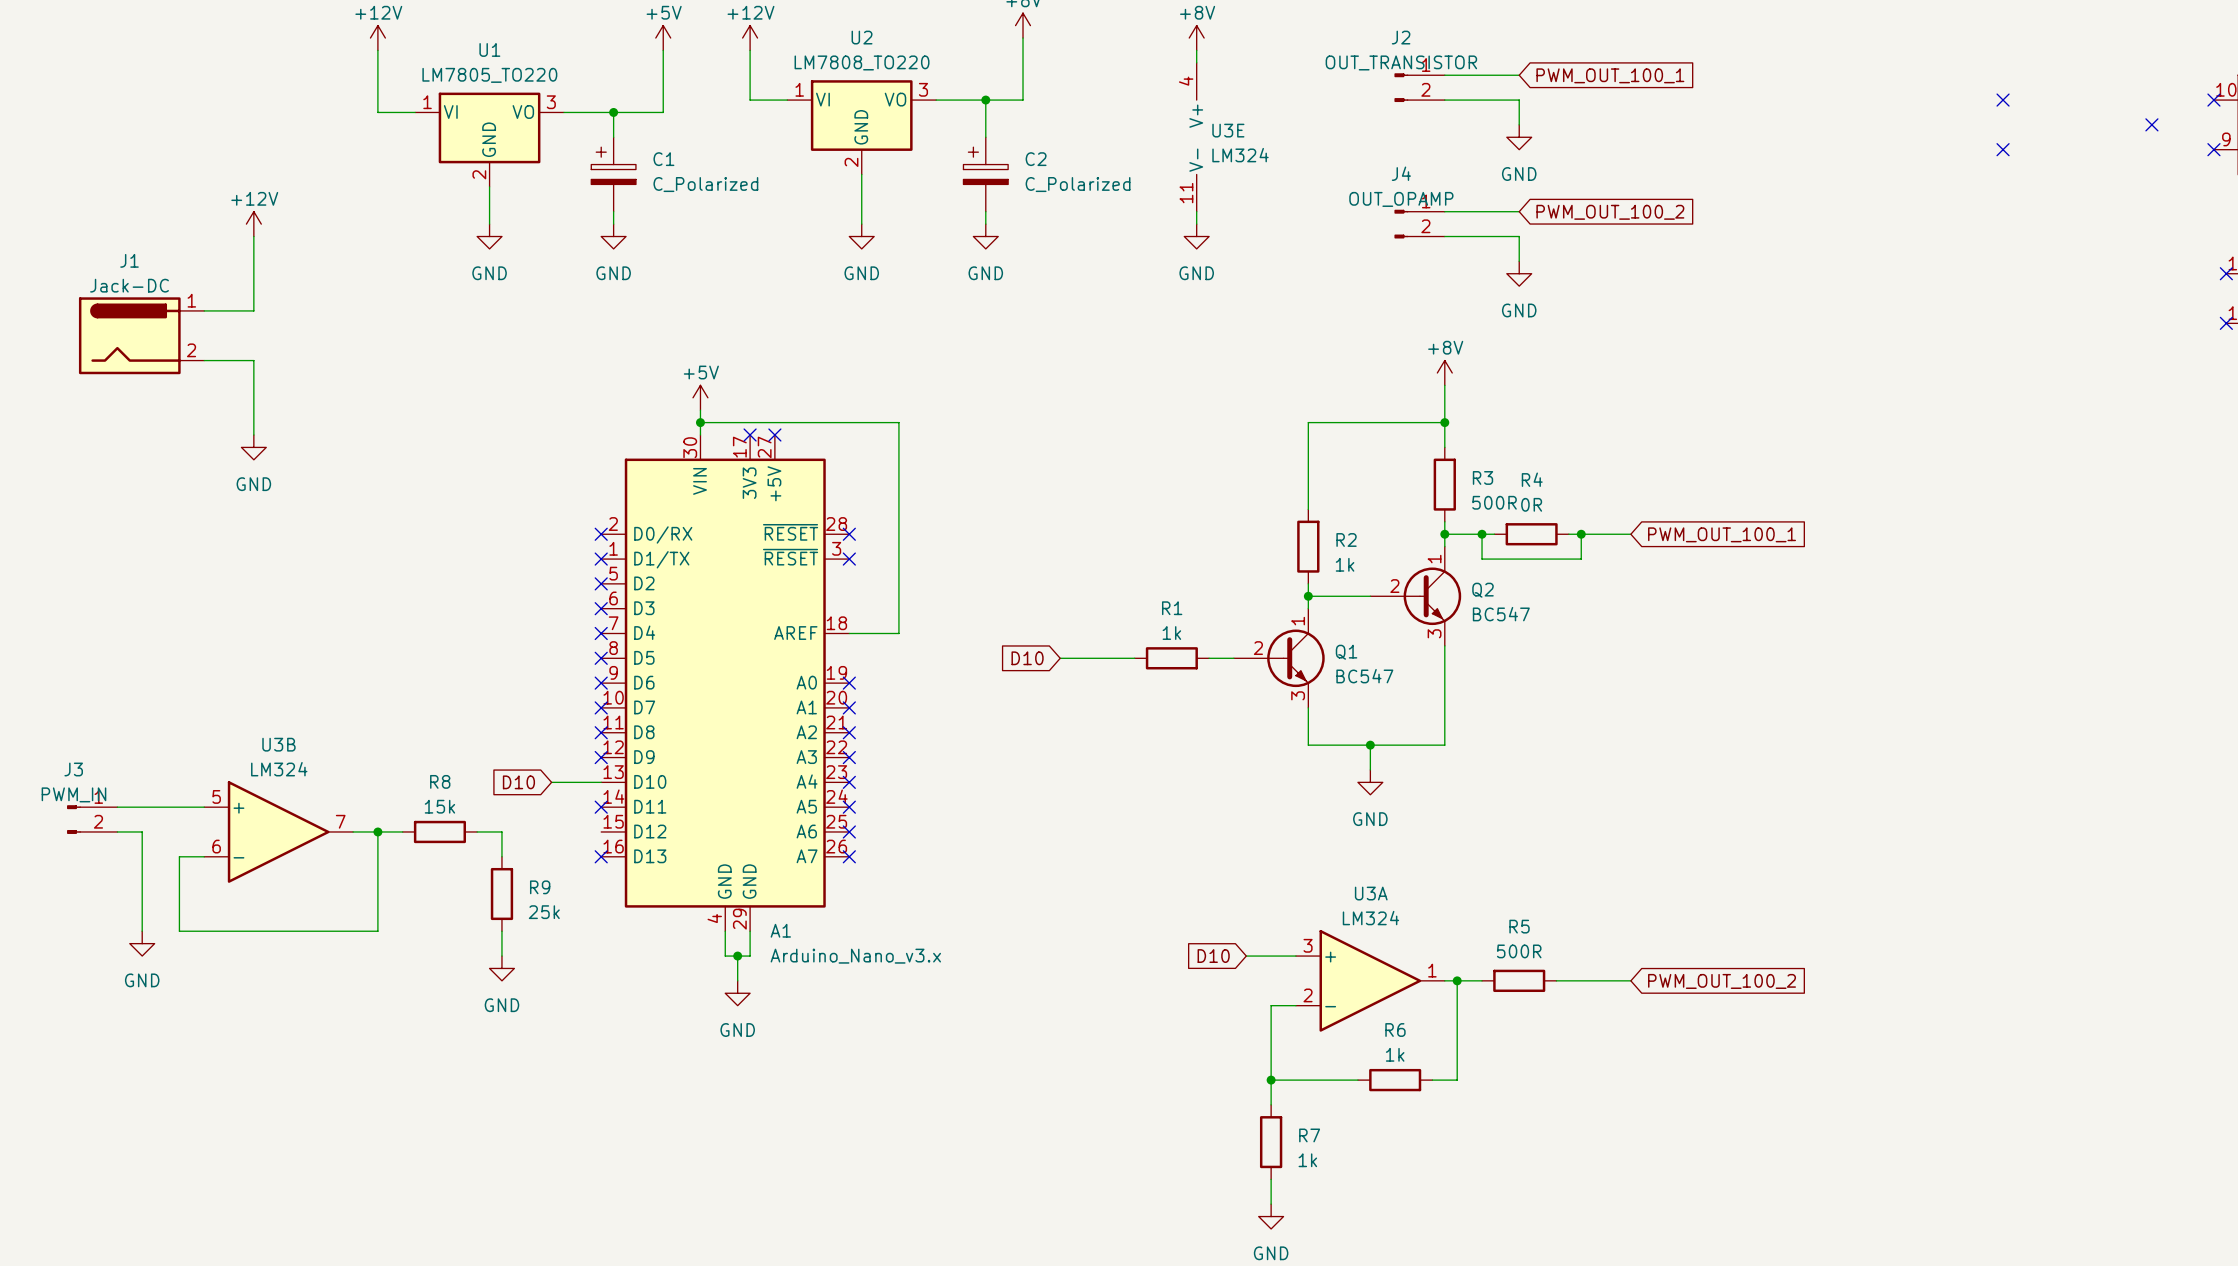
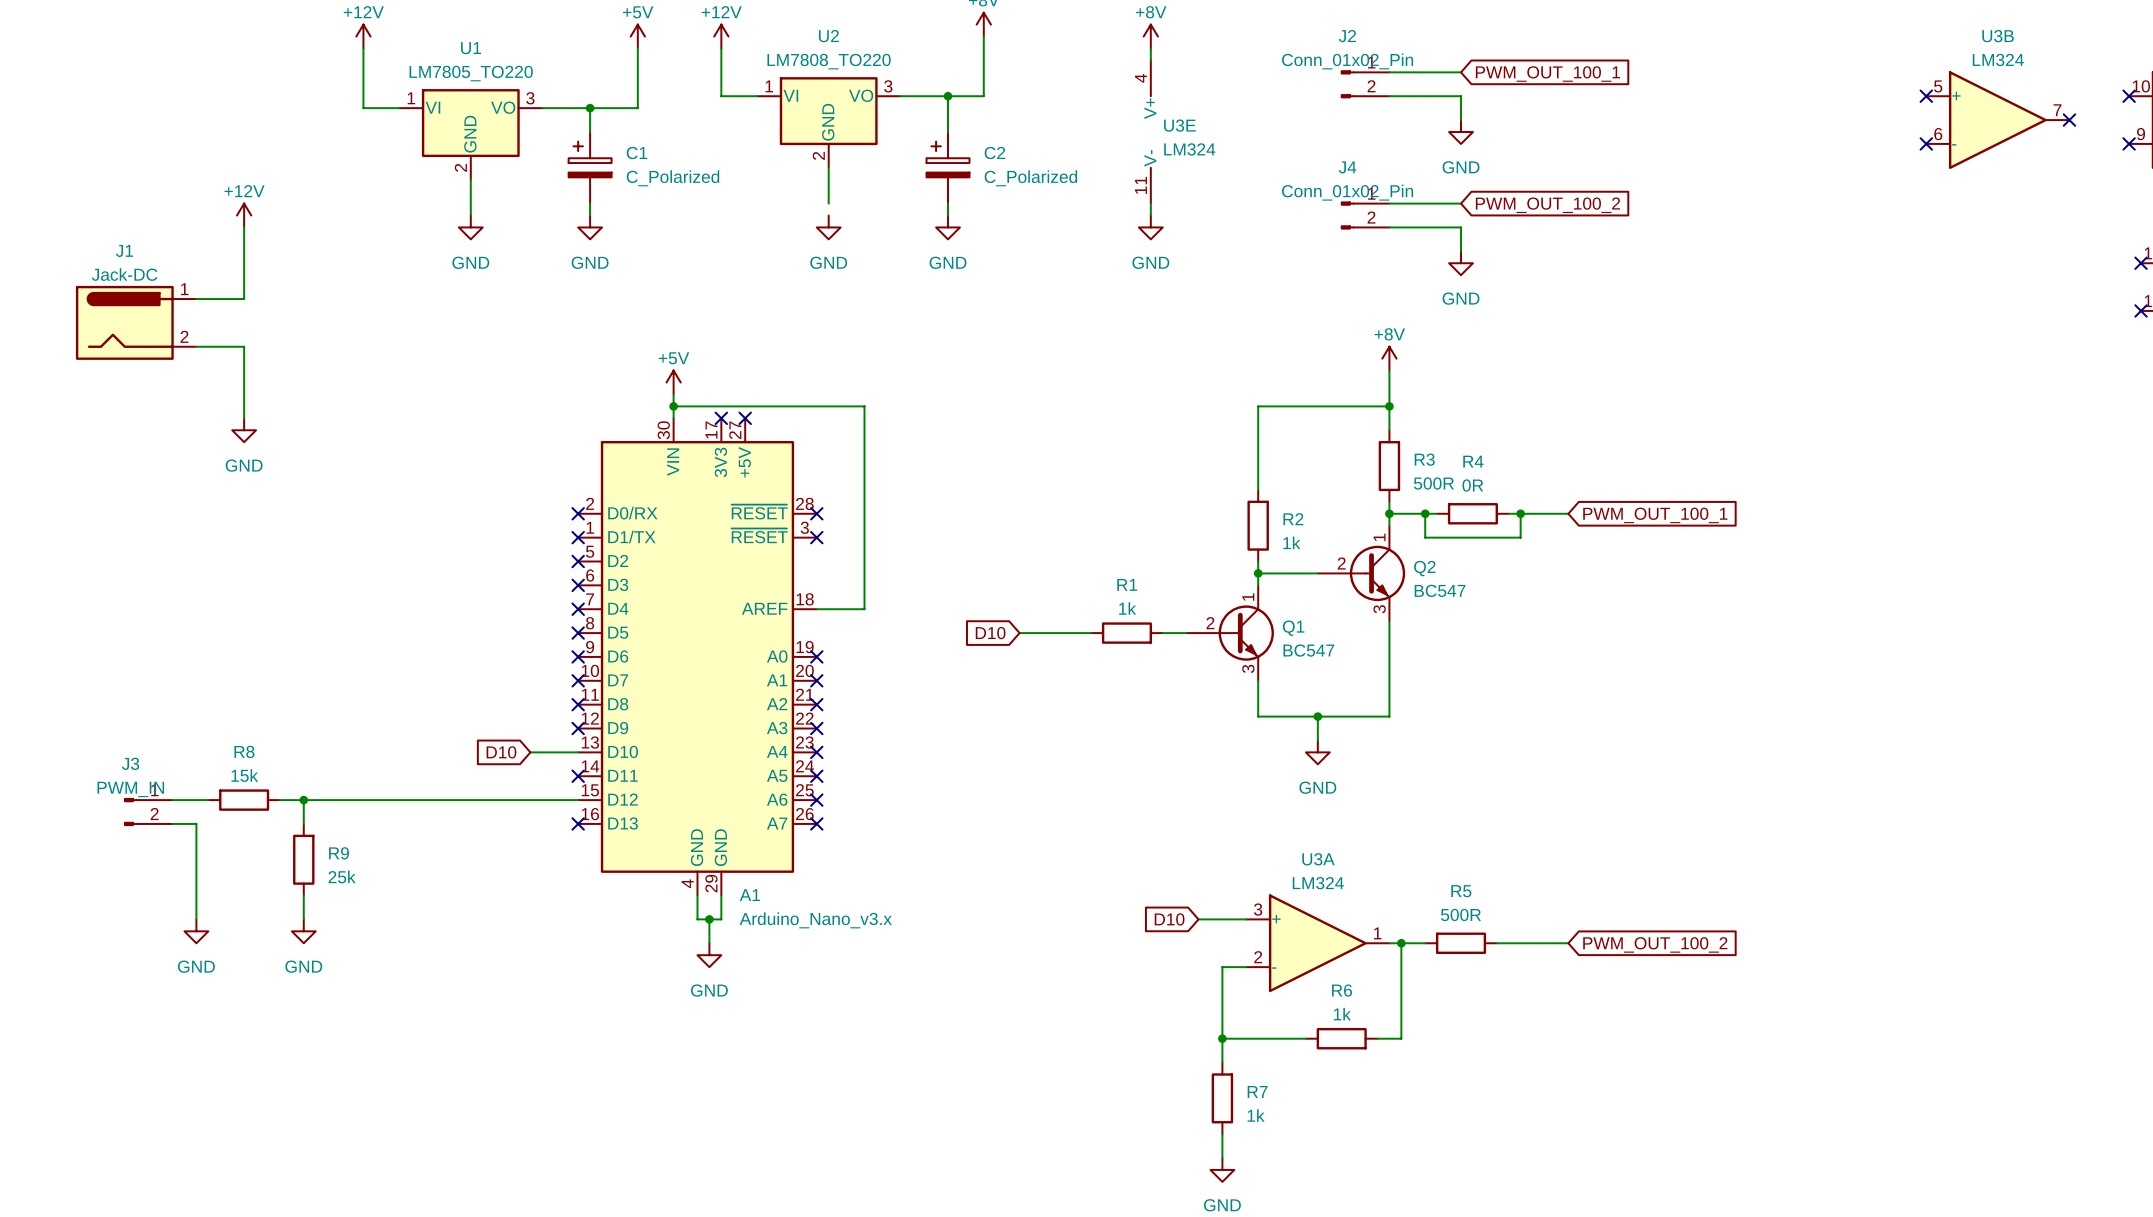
J2 value: OUT_TRANSISTOR (1401, 62) -> Conn_01x02_Pin (1347, 61)
J4 value: OUT_OPAMP (1401, 199) -> Conn_01x02_Pin (1347, 192)
wire: (861, 211) (861, 224) -> none
wire: (117, 807) (204, 807) -> none
J3 position: (92, 819) -> (148, 812)
wire: (117, 831) (142, 831) (142, 931) -> none
wire: none -> (172, 800) (208, 800)
U3B position: (278, 831) -> (1997, 120)
wire: none -> (303, 800) (303, 823)
junction: none -> (303, 800)
wire: (377, 831) (377, 931) (179, 931) (179, 856) -> none
junction: (377, 831) -> none
wire: none -> (387, 800) (458, 800)
R8 position: (439, 831) -> (244, 800)
wire: (501, 831) (501, 856) -> (482, 800) (578, 800)
wire: none -> (196, 823) (196, 919)
R9 position: (501, 894) -> (303, 859)
wire: (501, 931) (501, 956) -> (303, 895) (303, 919)
power symbol position: GND (142, 943) -> GND (196, 931)
power symbol: none -> GND (303, 931)
power symbol: GND (501, 968) -> none

